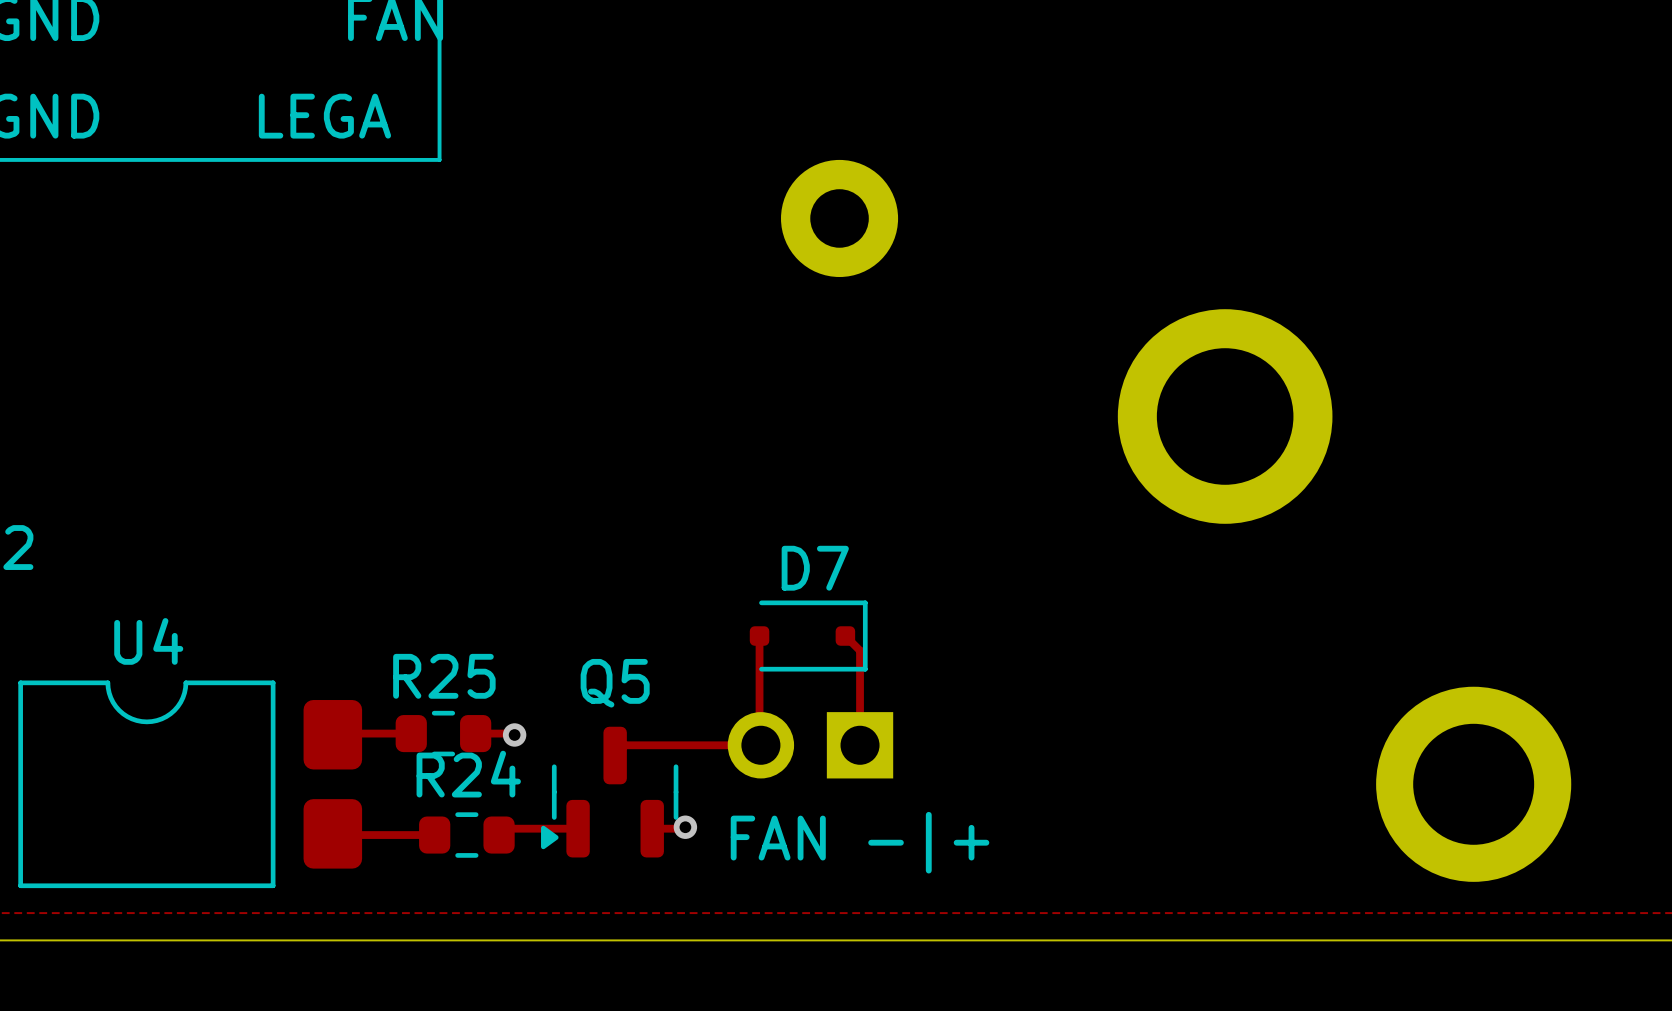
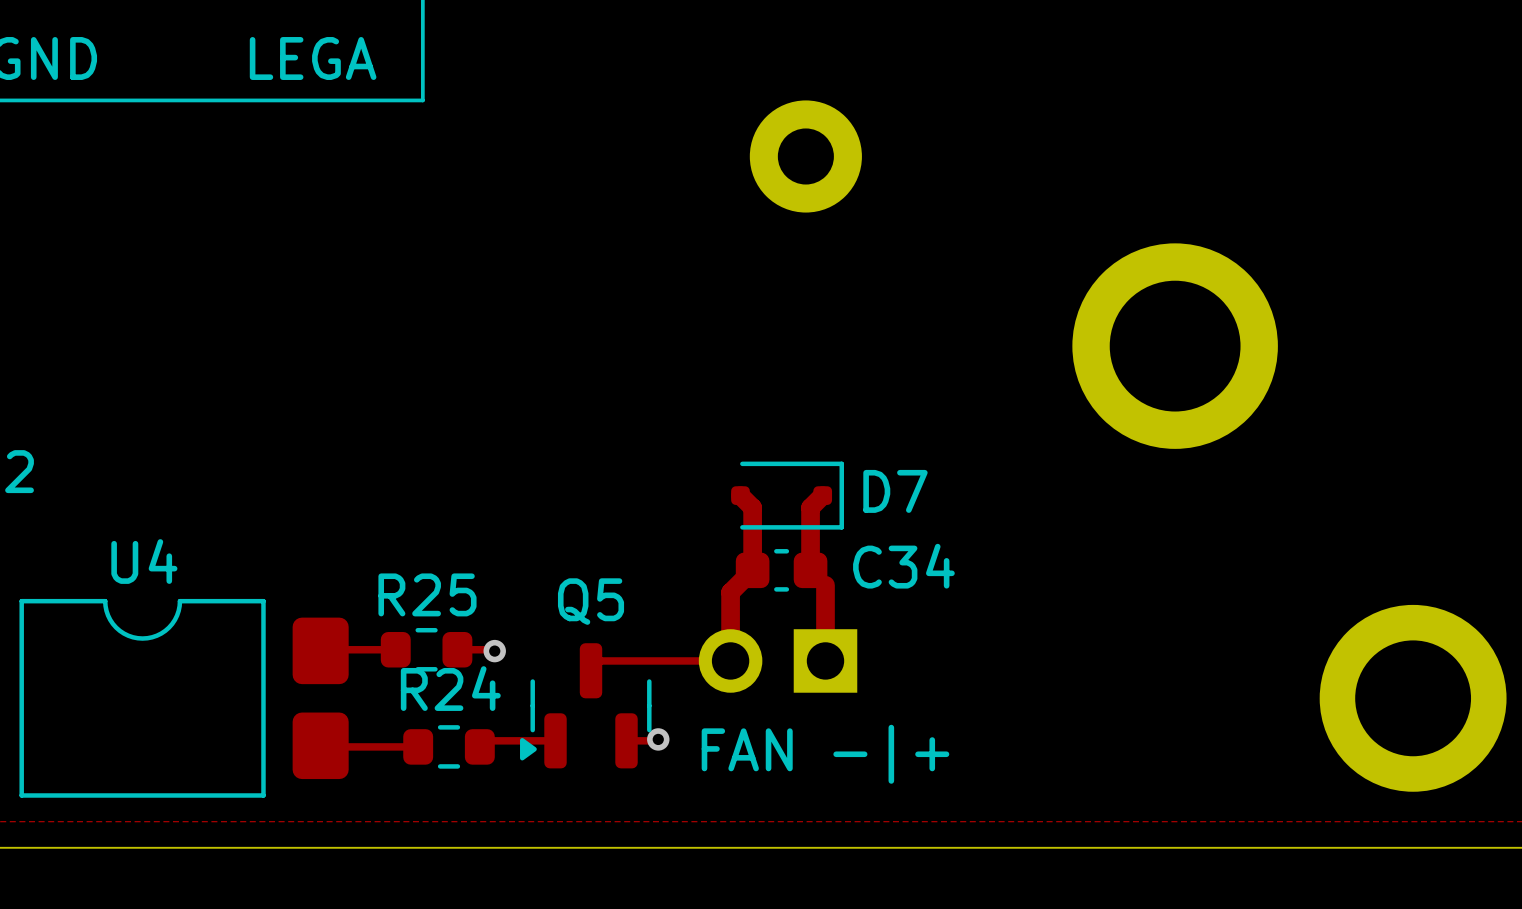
D7 name position: D7 (815, 568) -> D7 (895, 491)
track: none -> (740, 495) (752, 507) (752, 570) (730, 592) (730, 660)
track: (759, 636) (759, 743) -> none
D7 position: (808, 636) -> (787, 495)
track: (845, 636) (860, 650) (860, 666) -> (822, 495) (810, 507) (810, 570) (825, 585)
C34: none -> (781, 570)
track width: thin (860, 666) (860, 745) -> thick (825, 585) (825, 660)

